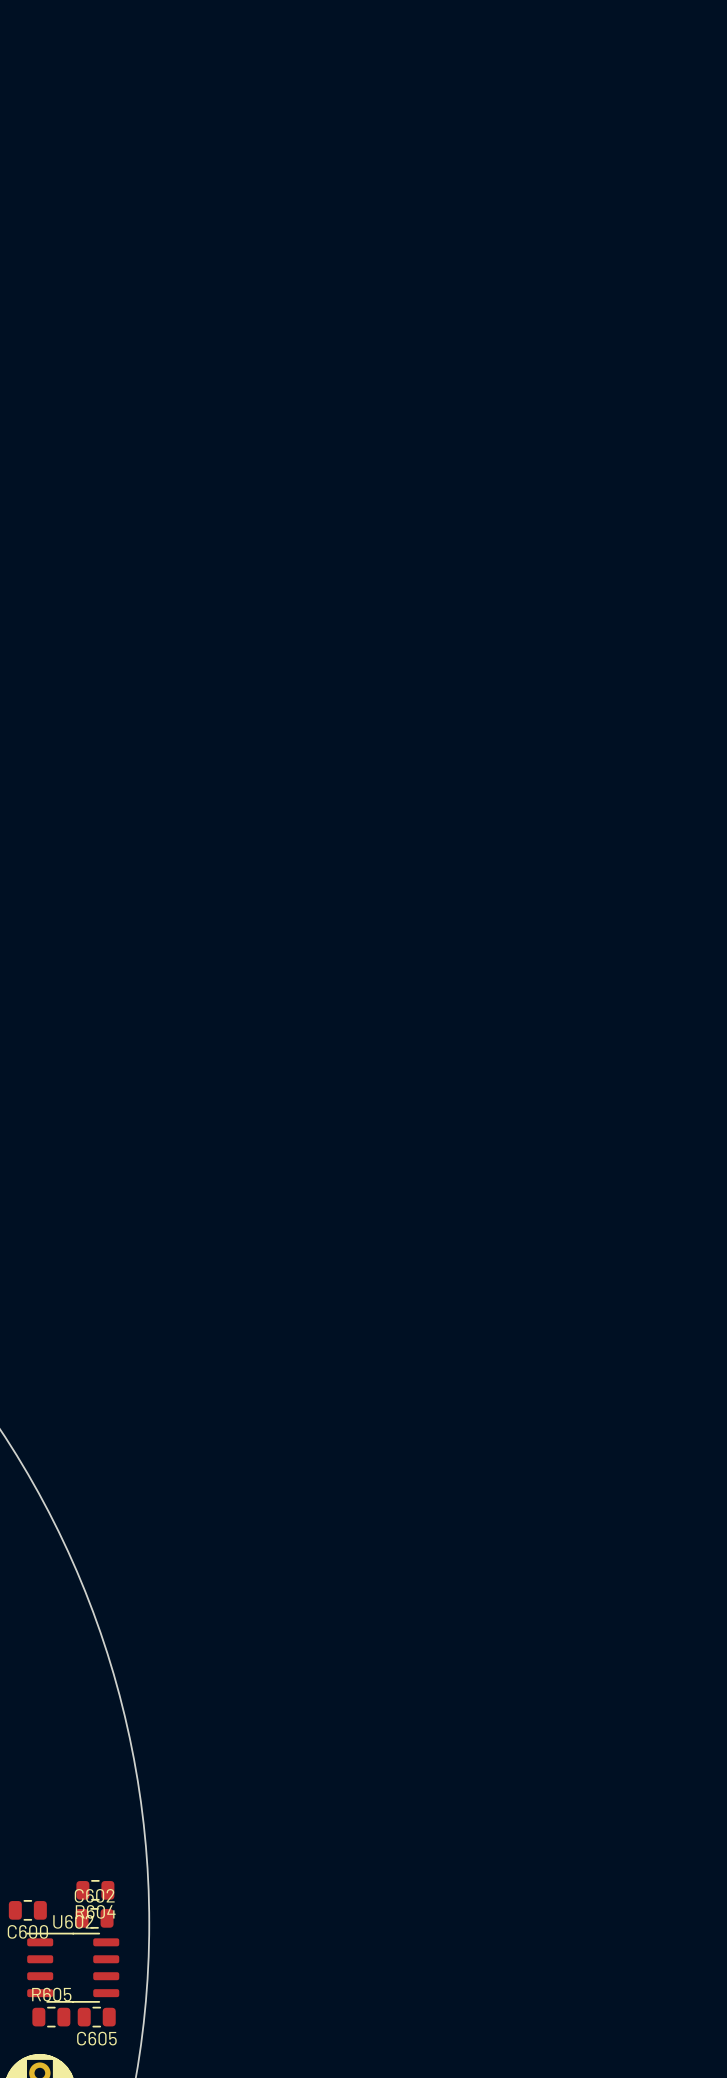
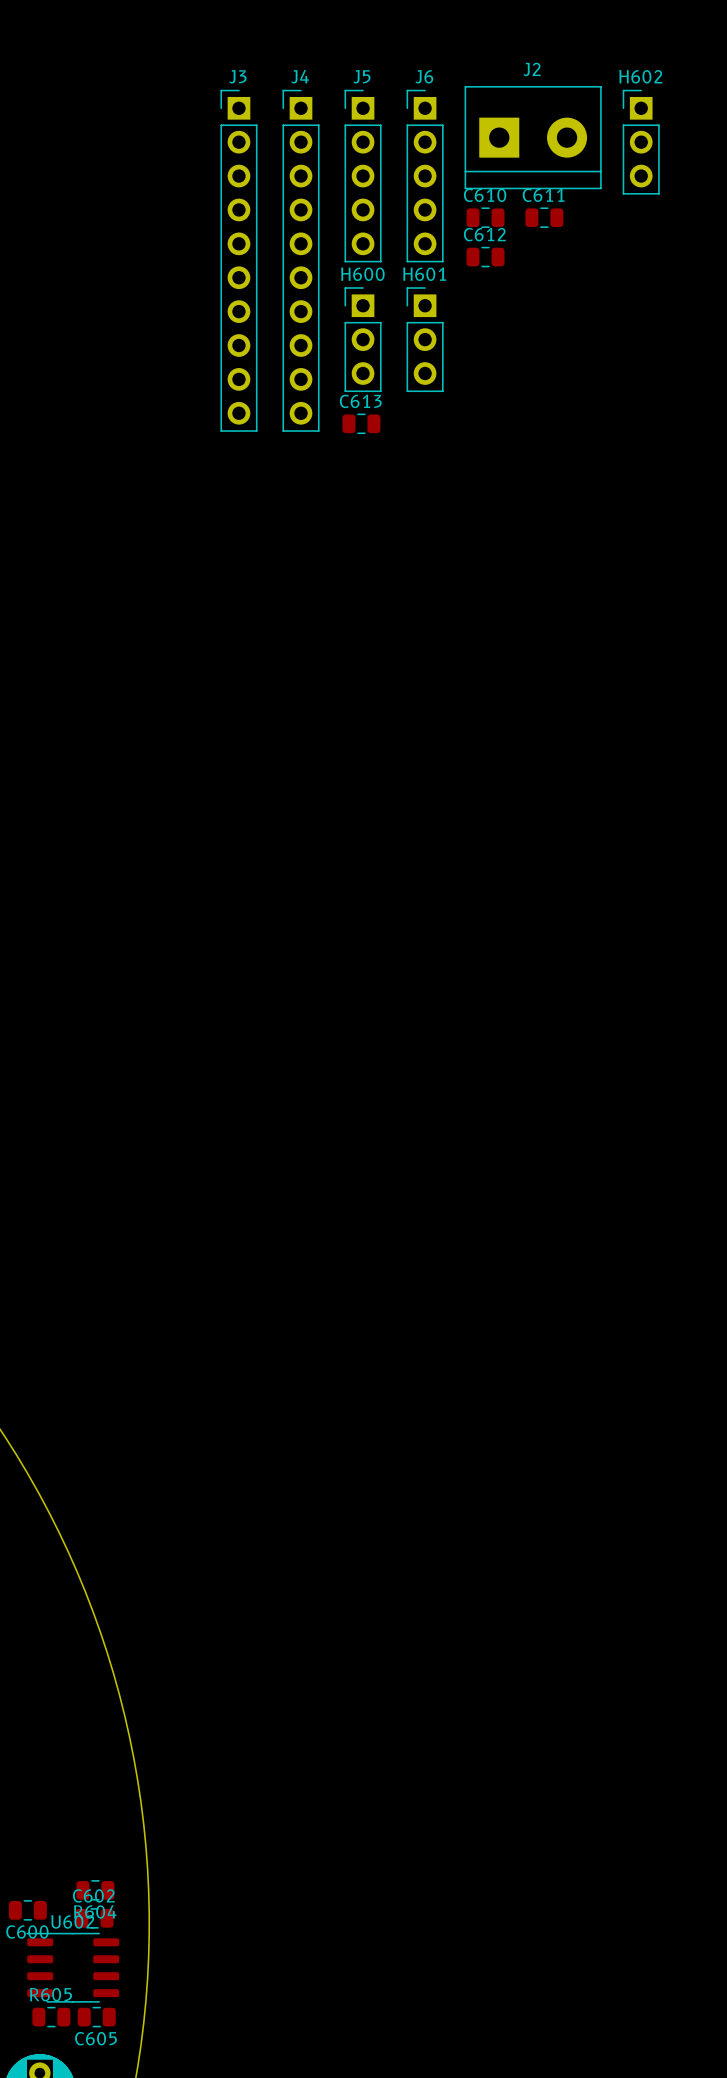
J2: none -> (533, 137)
H602: none -> (641, 142)
J5: none -> (363, 176)
J6: none -> (425, 176)
C610: none -> (485, 217)
C611: none -> (544, 217)
C612: none -> (485, 257)
J3: none -> (238, 260)
J4: none -> (301, 260)
H600: none -> (363, 339)
H601: none -> (425, 339)
C613: none -> (361, 423)

